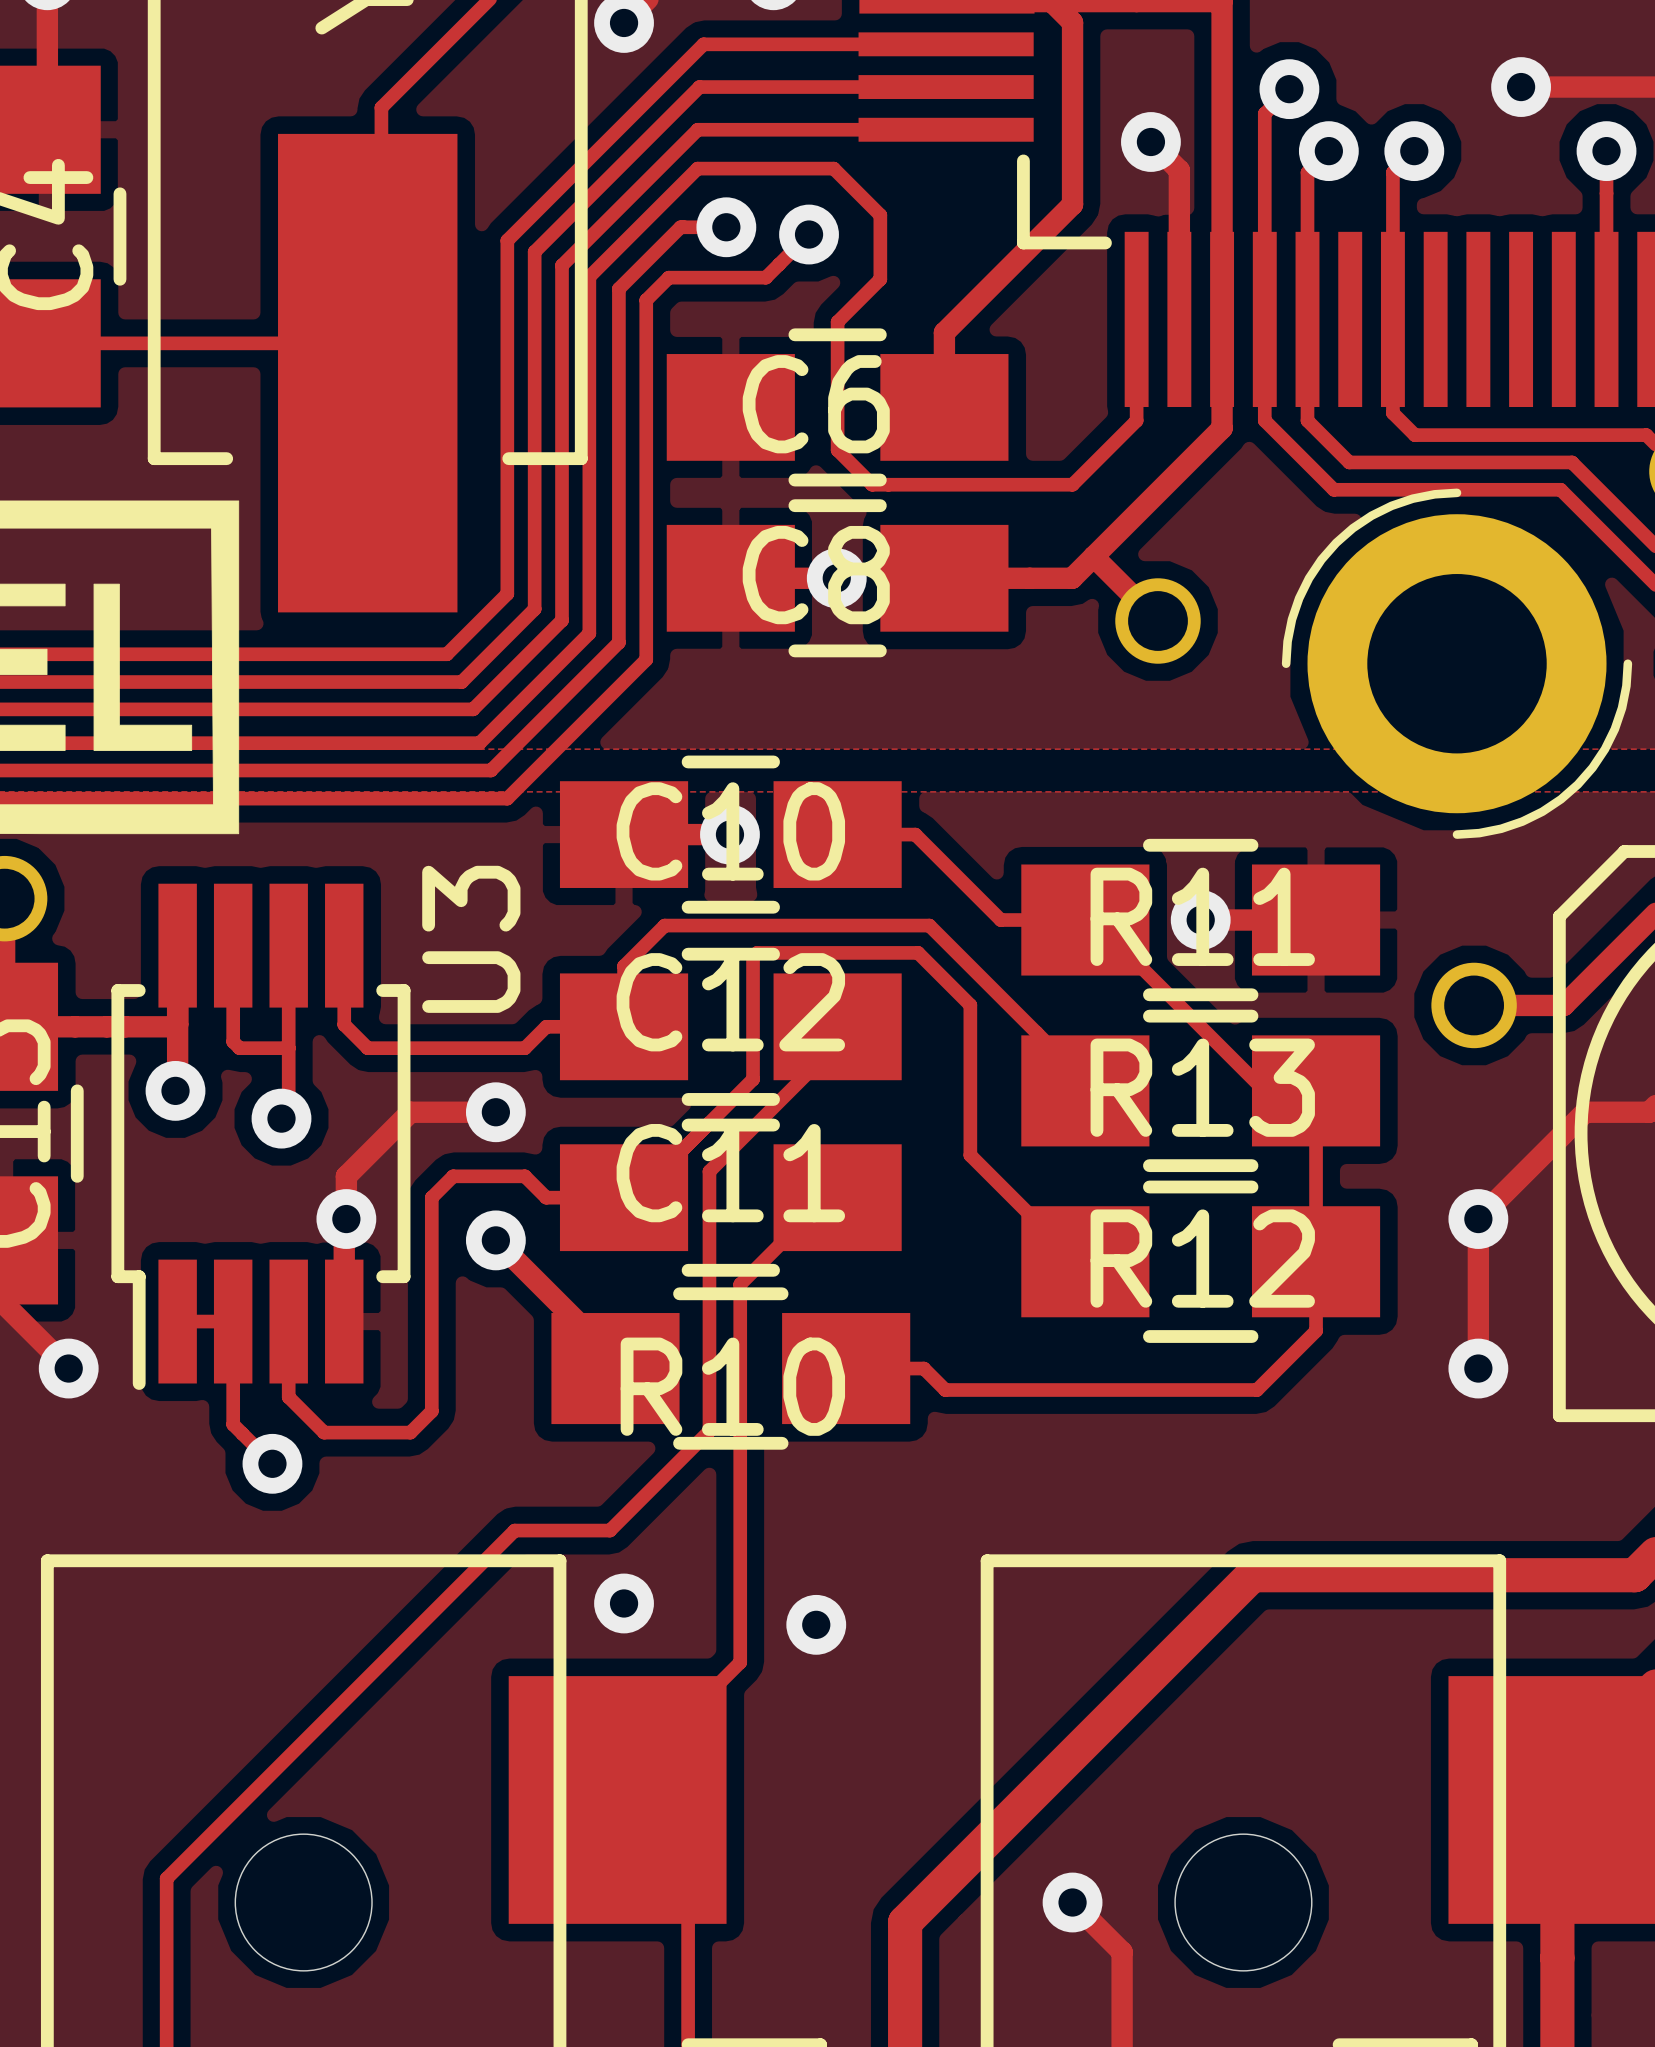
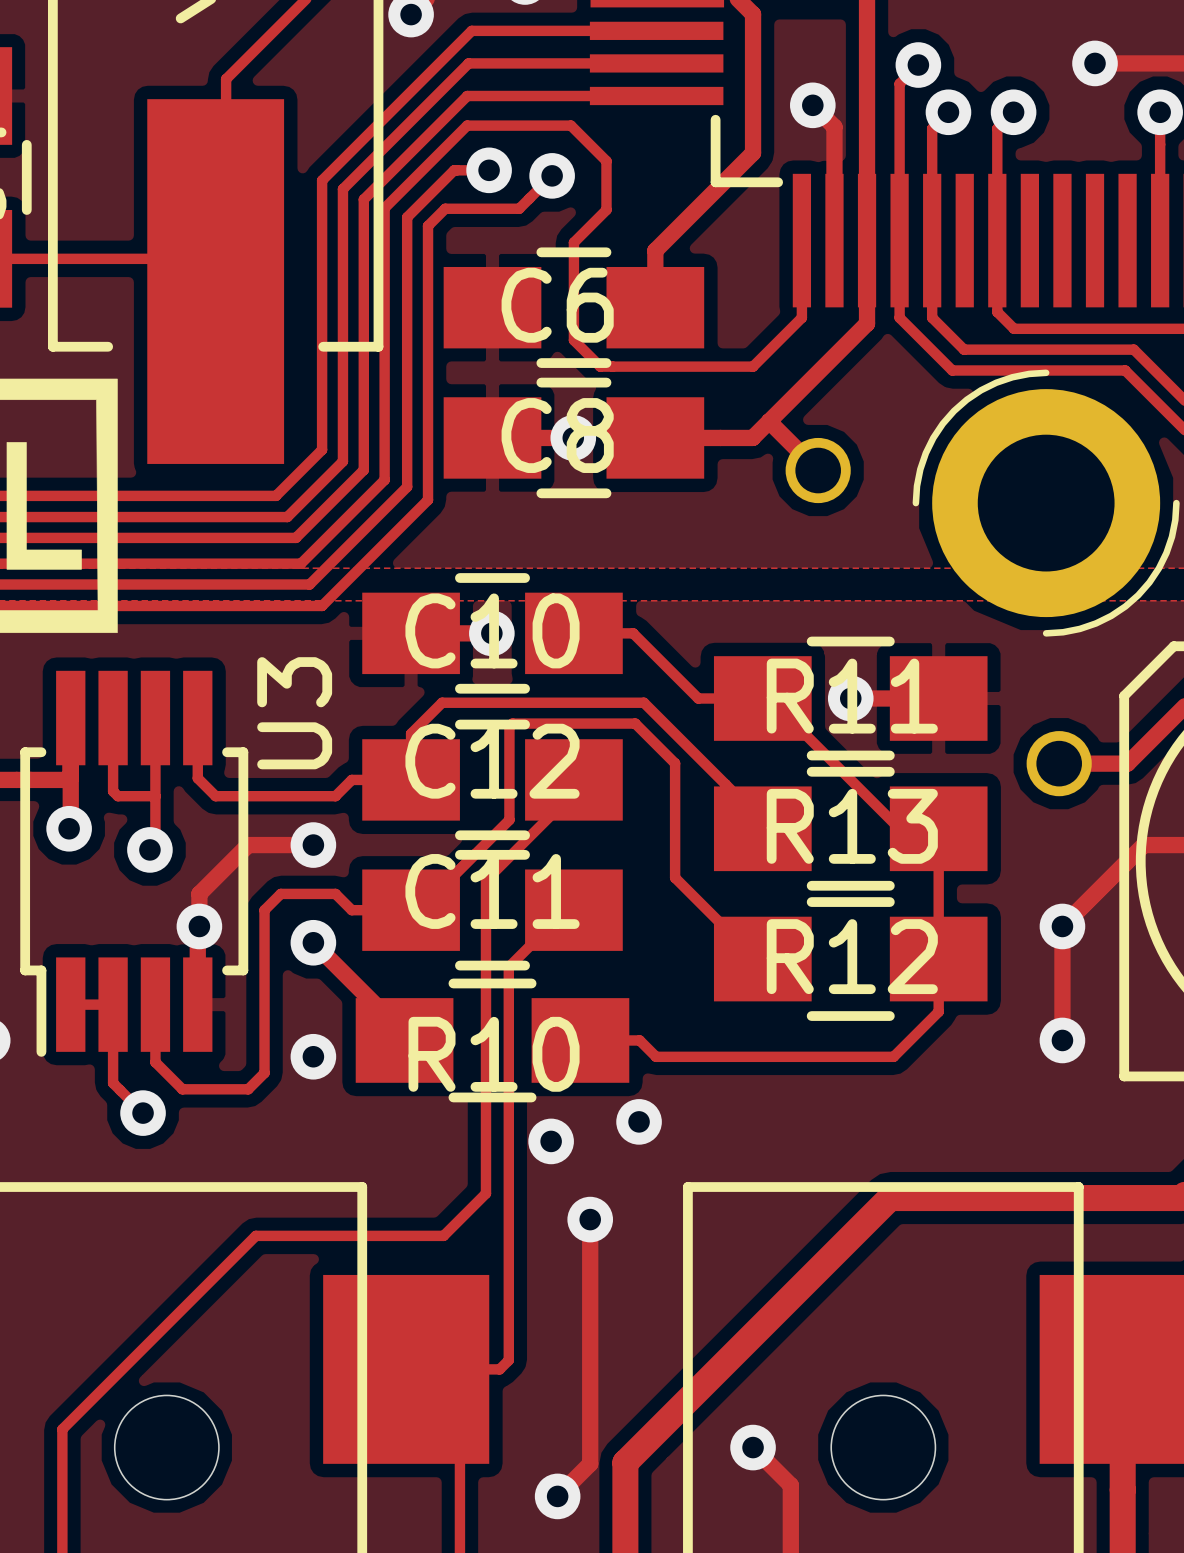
track: (722, 1158) (709, 1171) (709, 1431) (609, 1530) (514, 1530) (420, 1624) -> (485, 880) (485, 1193) (443, 1235) (255, 1235)
track: (752, 1272) (740, 1284) (740, 1662) (617, 1785) (617, 1799) -> (508, 967) (508, 1360) (499, 1369) (406, 1369)
via: none -> (313, 1056)
via: none -> (639, 1121)
via: none -> (551, 1141)
via: (624, 1603) -> none
track: none -> (590, 1219) (590, 1463) (557, 1496)
via position: (816, 1624) -> (590, 1219)
via: none -> (557, 1496)

